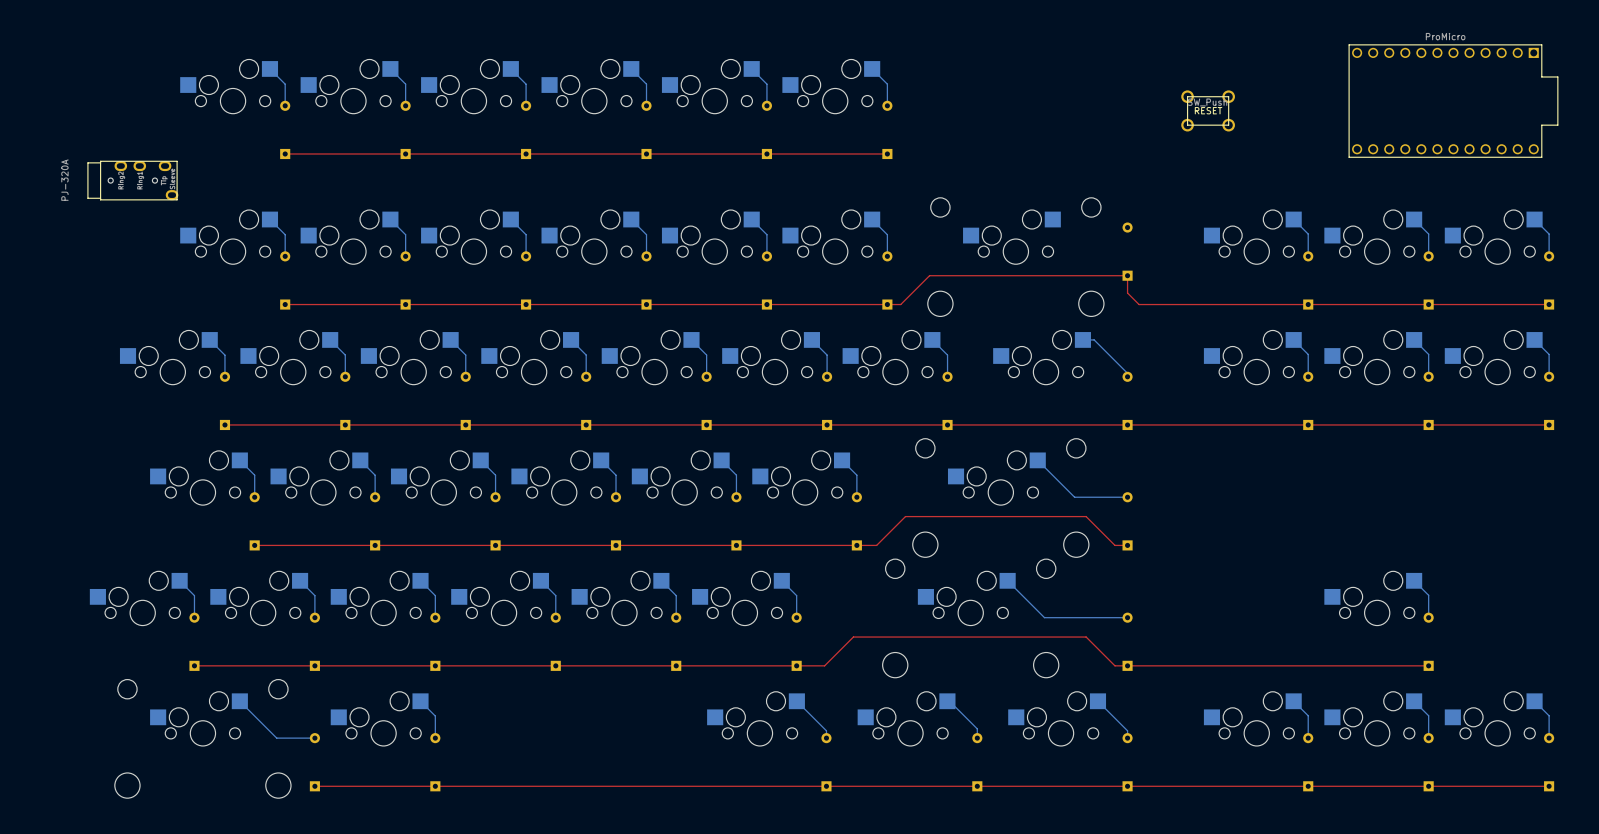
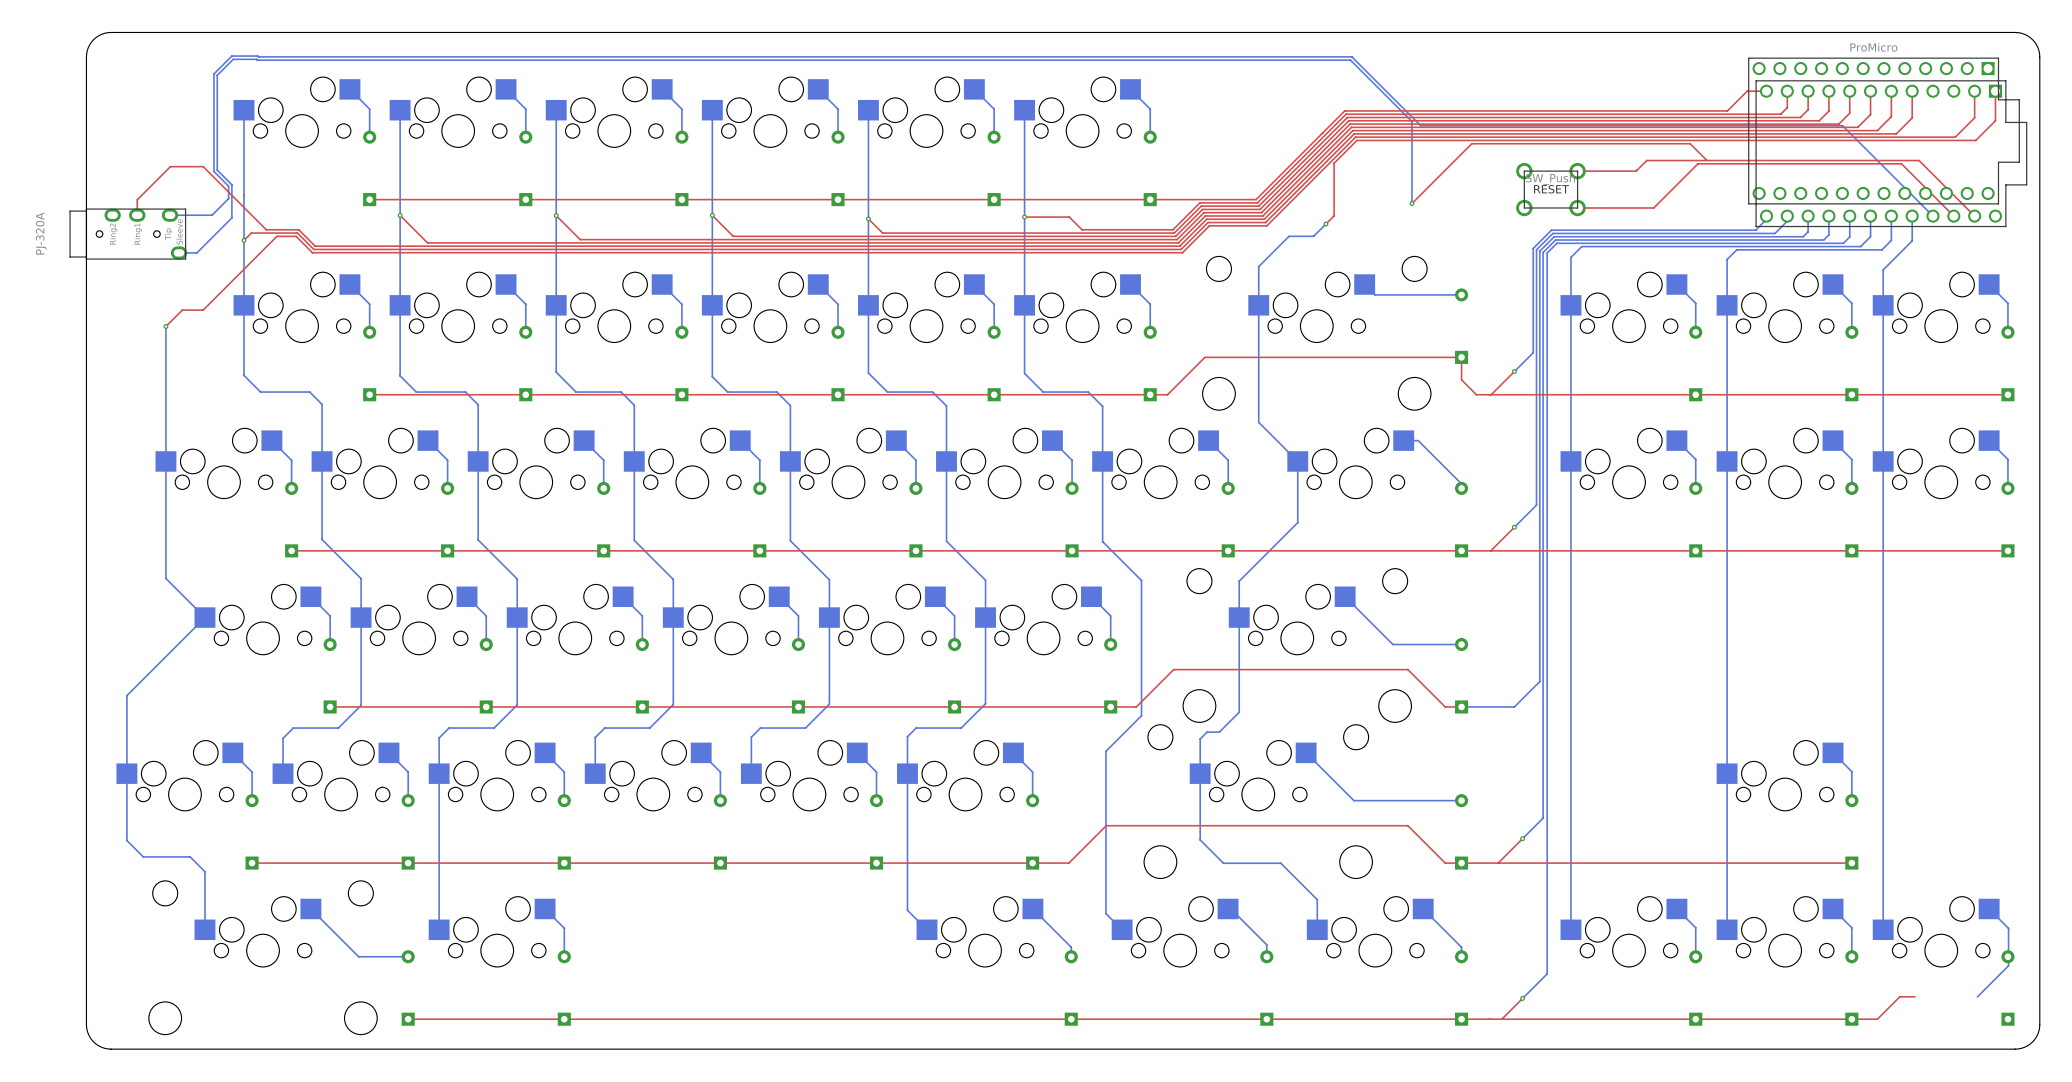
board edge: none -> (111, 32) (2015, 32) (2027, 35) (2036, 44) (2039, 57) (2039, 1024) (2036, 1036) (2027, 1045) (2015, 1049) (111, 1049) (98, 1045) (89, 1036) (86, 1024) (86, 57) (88, 47) (93, 39) (101, 34) (111, 32)
top track: none -> (1766, 91) (1747, 91) (1727, 110) (1344, 110) (1256, 199) (1150, 199)
top track: none -> (1787, 91) (1787, 107) (1780, 114) (1346, 114) (1257, 202) (1199, 202) (1173, 229) (1082, 229) (1069, 217) (1024, 217)
top track: none -> (1808, 91) (1808, 109) (1800, 117) (1347, 117) (1258, 206) (1201, 206) (1174, 233) (882, 233) (868, 218)
top track: none -> (1828, 91) (1828, 111) (1819, 120) (1348, 120) (1260, 209) (1202, 209) (1175, 236) (733, 236) (712, 215)
top track: none -> (1849, 91) (1849, 113) (1838, 124) (1350, 124) (1261, 212) (1203, 212) (1177, 239) (580, 239) (556, 215)
top track: none -> (1870, 91) (1870, 114) (1857, 127) (1351, 127) (1262, 215) (1205, 215) (1178, 242) (427, 242) (400, 215)
top track: none -> (1891, 91) (1891, 116) (1877, 130) (1352, 130) (1264, 219) (1206, 219) (1179, 246) (315, 246) (298, 229) (266, 229) (203, 166) (170, 166) (137, 199) (137, 215)
top track: none -> (1912, 91) (1912, 117) (1896, 133) (1354, 133) (1265, 222) (1208, 222) (1181, 249) (313, 249) (297, 233) (251, 233) (244, 240)
top track: none -> (1974, 91) (1974, 117) (1955, 137) (1355, 137) (1266, 225) (1209, 225) (1182, 252) (312, 252) (296, 236) (276, 236) (203, 310) (182, 310) (165, 326)
top track: none -> (1995, 91) (1995, 120) (1975, 140) (1356, 140) (1334, 163) (1334, 215) (1325, 224)
bottom track: none -> (244, 110) (244, 375) (260, 392) (309, 392) (322, 404) (322, 539) (361, 578) (361, 705) (338, 728) (293, 728) (283, 738) (283, 773)
bottom track: none -> (400, 110) (399, 375) (416, 392) (465, 392) (478, 404) (478, 539) (517, 579) (517, 704) (494, 728) (449, 728) (439, 737) (439, 929)
bottom track: none -> (556, 110) (556, 372) (576, 392) (621, 392) (634, 405) (634, 540) (673, 579) (673, 704) (649, 728) (604, 728) (595, 737) (595, 773)
bottom track: none -> (712, 110) (712, 376) (727, 392) (776, 392) (790, 405) (790, 540) (829, 579) (829, 704) (805, 728) (760, 728) (751, 737) (751, 773)
bottom track: none -> (868, 110) (868, 373) (887, 392) (932, 392) (946, 405) (946, 541) (985, 580) (985, 703) (961, 728) (916, 728) (907, 736) (907, 910) (926, 929)
bottom track: none -> (1024, 110) (1024, 373) (1043, 392) (1088, 392) (1102, 406) (1102, 541) (1141, 580) (1141, 715) (1105, 751) (1105, 913) (1122, 929)
part position: (1208, 110) -> (1550, 189)
part: none -> (1891, 153)
top track: none -> (1706, 160) (1690, 143) (1471, 143) (1411, 203)
top track: none -> (1577, 171) (1636, 171)
top track: none -> (1636, 171) (1646, 160) (1919, 160) (1974, 216)
bottom track: none -> (1411, 203) (1411, 121) (1350, 60) (233, 59) (217, 75) (217, 170) (231, 184) (231, 217) (196, 252) (179, 252)
via: none -> (1411, 203)
top track: none -> (1577, 207) (1653, 207) (1697, 163) (1901, 163) (1953, 216)
bottom track: none -> (170, 215) (212, 215) (228, 198) (228, 186) (213, 171) (213, 73) (231, 56) (257, 56) (1351, 56) (1420, 125) (1842, 125) (1933, 216)
via: none -> (400, 215)
via: none -> (556, 215)
via: none -> (712, 215)
bottom track: none -> (1766, 216) (1766, 219) (1755, 230) (1551, 230) (1533, 248) (1533, 352) (1514, 371)
bottom track: none -> (1787, 216) (1787, 221) (1774, 233) (1552, 233) (1536, 249) (1536, 505) (1514, 527)
bottom track: none -> (1808, 216) (1808, 231) (1803, 236) (1554, 236) (1539, 251) (1539, 681) (1514, 706) (1461, 706)
bottom track: none -> (1828, 216) (1828, 234) (1823, 240) (1555, 240) (1543, 252) (1543, 818) (1522, 838)
bottom track: none -> (1849, 216) (1849, 236) (1843, 243) (1556, 243) (1547, 253) (1547, 973) (1522, 998)
bottom track: none -> (1870, 216) (1870, 236) (1860, 246) (1581, 246) (1570, 257) (1570, 929)
bottom track: none -> (1891, 216) (1891, 240) (1881, 249) (1736, 249) (1727, 259) (1727, 929)
bottom track: none -> (1912, 216) (1912, 240) (1883, 269) (1883, 929)
via: none -> (1024, 217)
via: none -> (868, 218)
bottom track: none -> (1325, 224) (1313, 236) (1289, 236) (1258, 266) (1258, 422) (1297, 461) (1297, 522) (1239, 581) (1239, 712) (1219, 732) (1207, 732) (1200, 739) (1200, 839) (1223, 863) (1280, 863) (1317, 899) (1317, 929)
via: none -> (1325, 224)
part position: (132, 180) -> (128, 234)
via: none -> (244, 240)
bottom track: none -> (1364, 284) (1375, 294) (1461, 294)
bottom track: none -> (165, 326) (165, 578) (204, 617) (126, 695) (126, 840) (143, 856) (190, 856) (204, 871) (204, 929)
via: none -> (165, 326)
top track: none -> (1514, 371) (1491, 394)
via: none -> (1514, 371)
top track: none -> (1514, 527) (1490, 550)
via: none -> (1514, 527)
top track: none -> (1522, 838) (1498, 863)
via: none -> (1522, 838)
bottom track: (1549, 715) (1549, 738) -> (2007, 927) (2008, 965) (1977, 996)
top track: none -> (1522, 998) (1501, 1019)
via: none -> (1522, 998)
top track: (1448, 786) (1549, 786) -> (1877, 1019) (1899, 996) (1915, 996)

